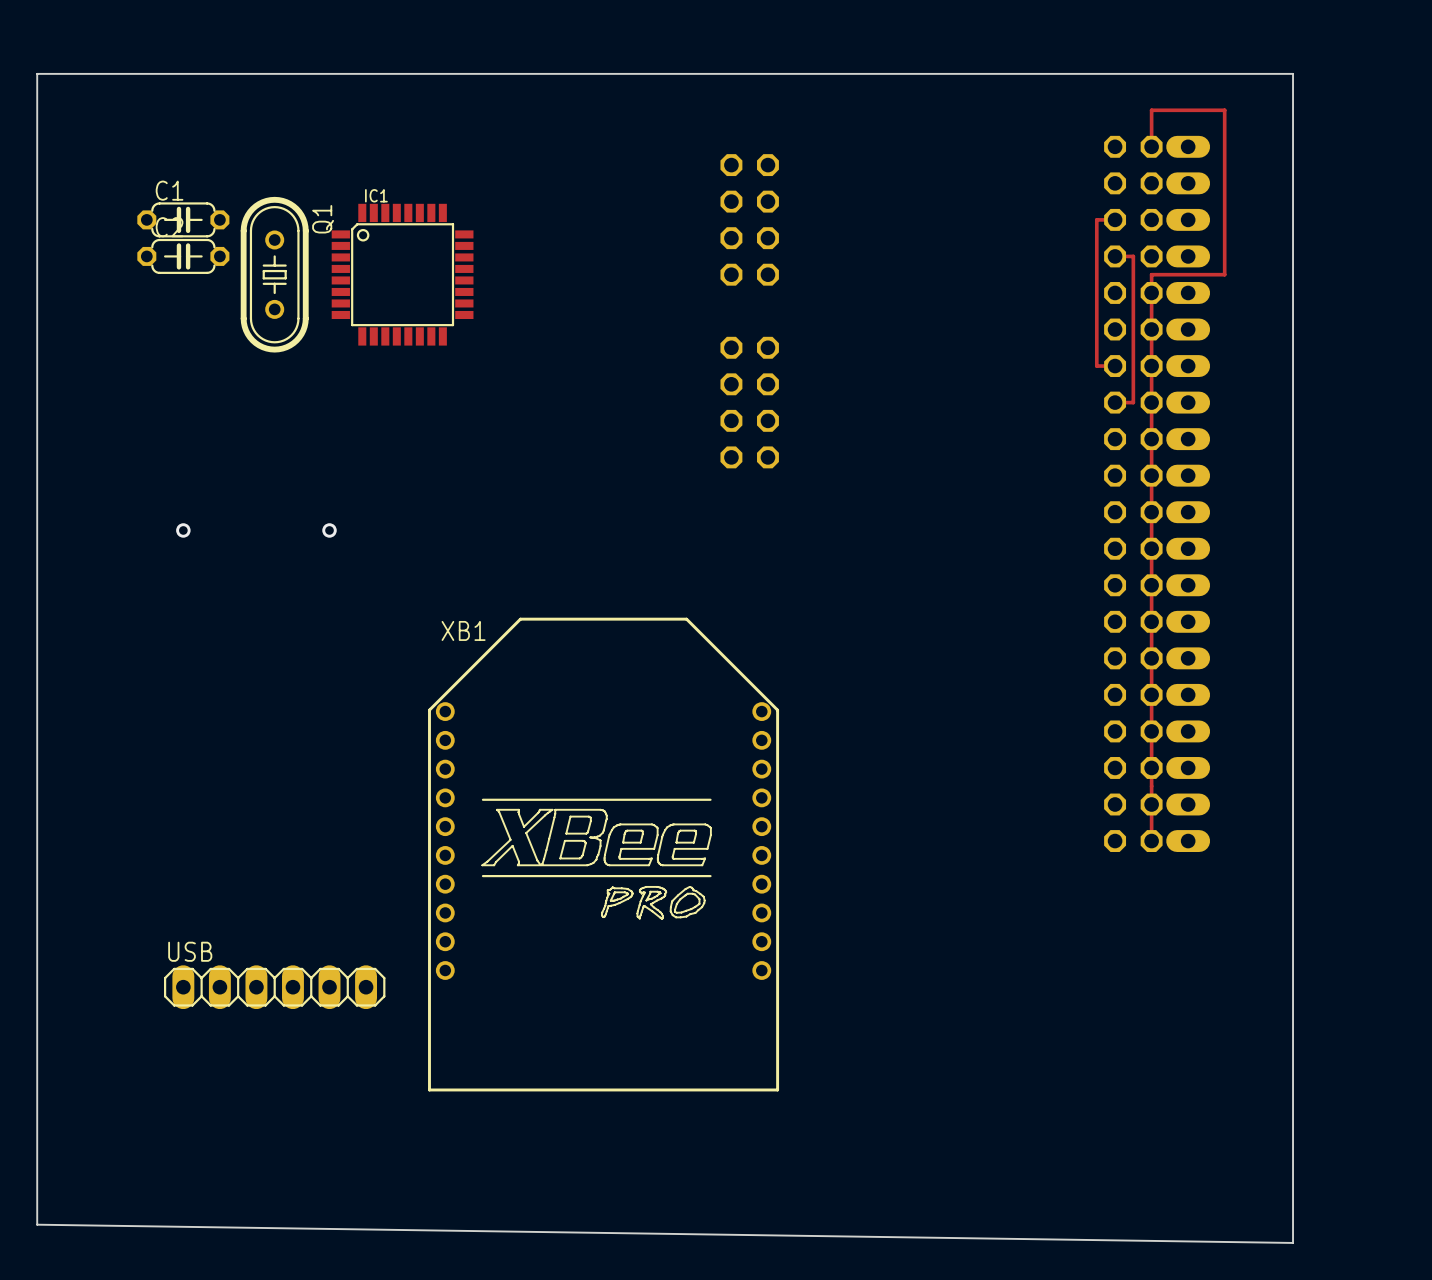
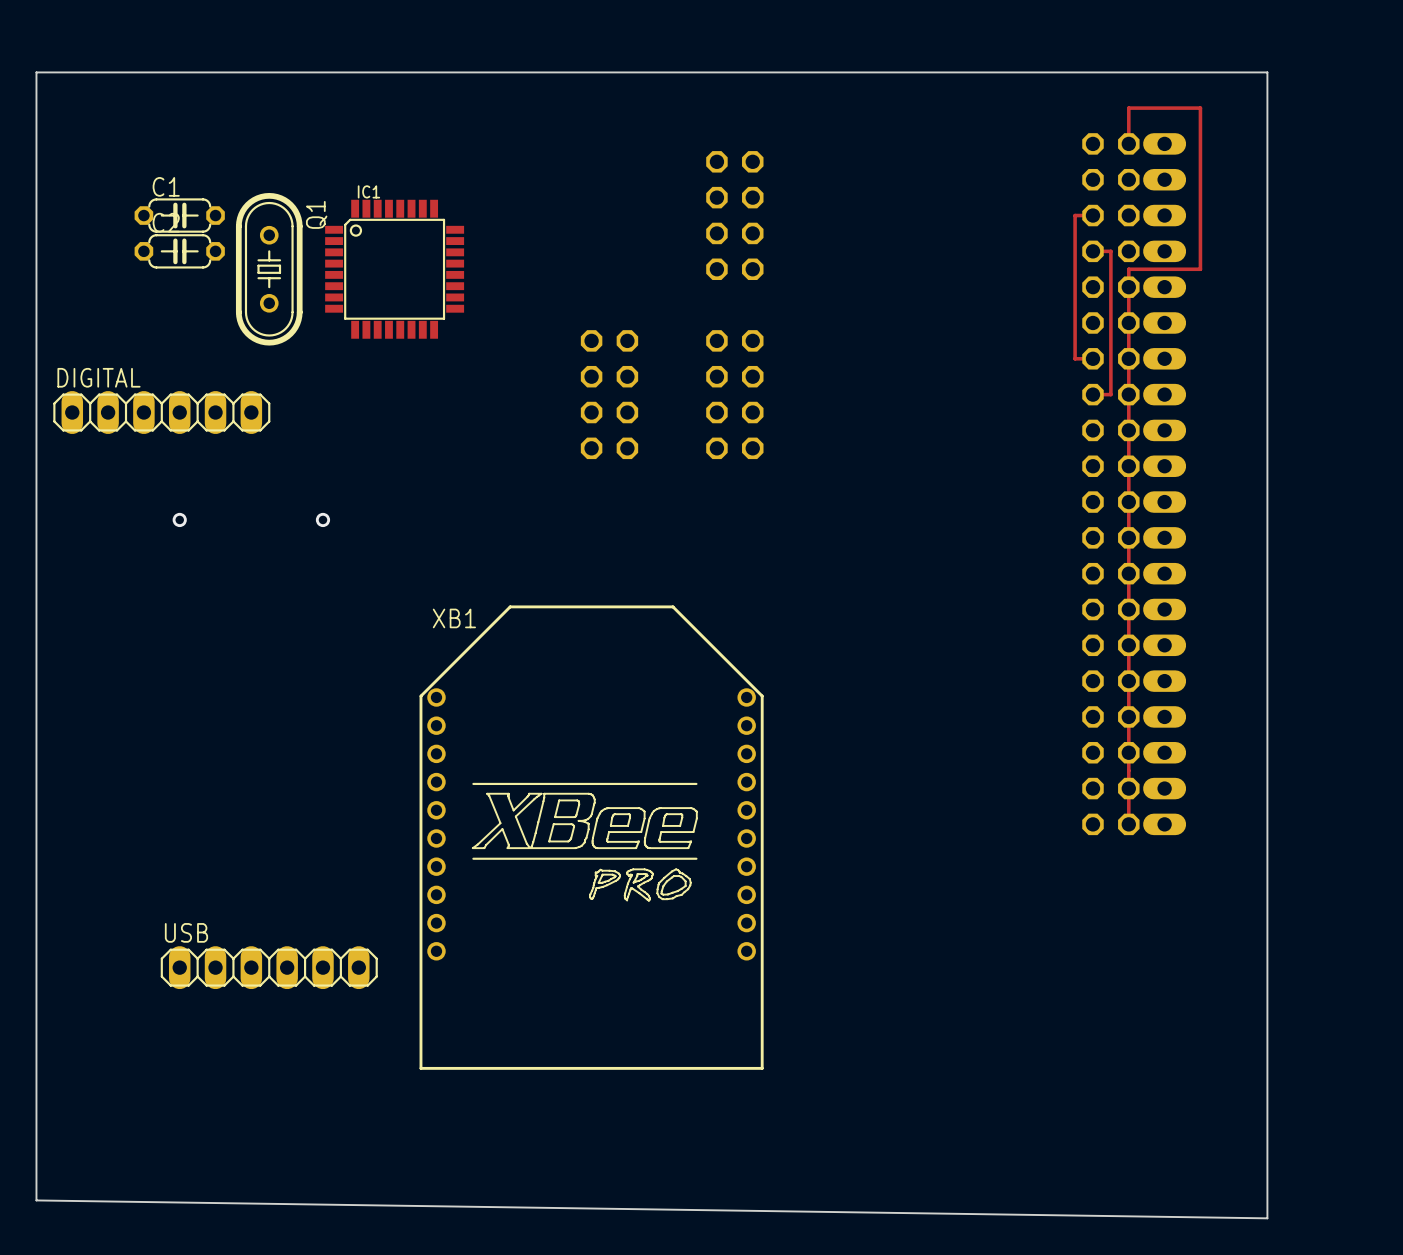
part: none -> (609, 394)
DIGITAL: none -> (161, 412)

